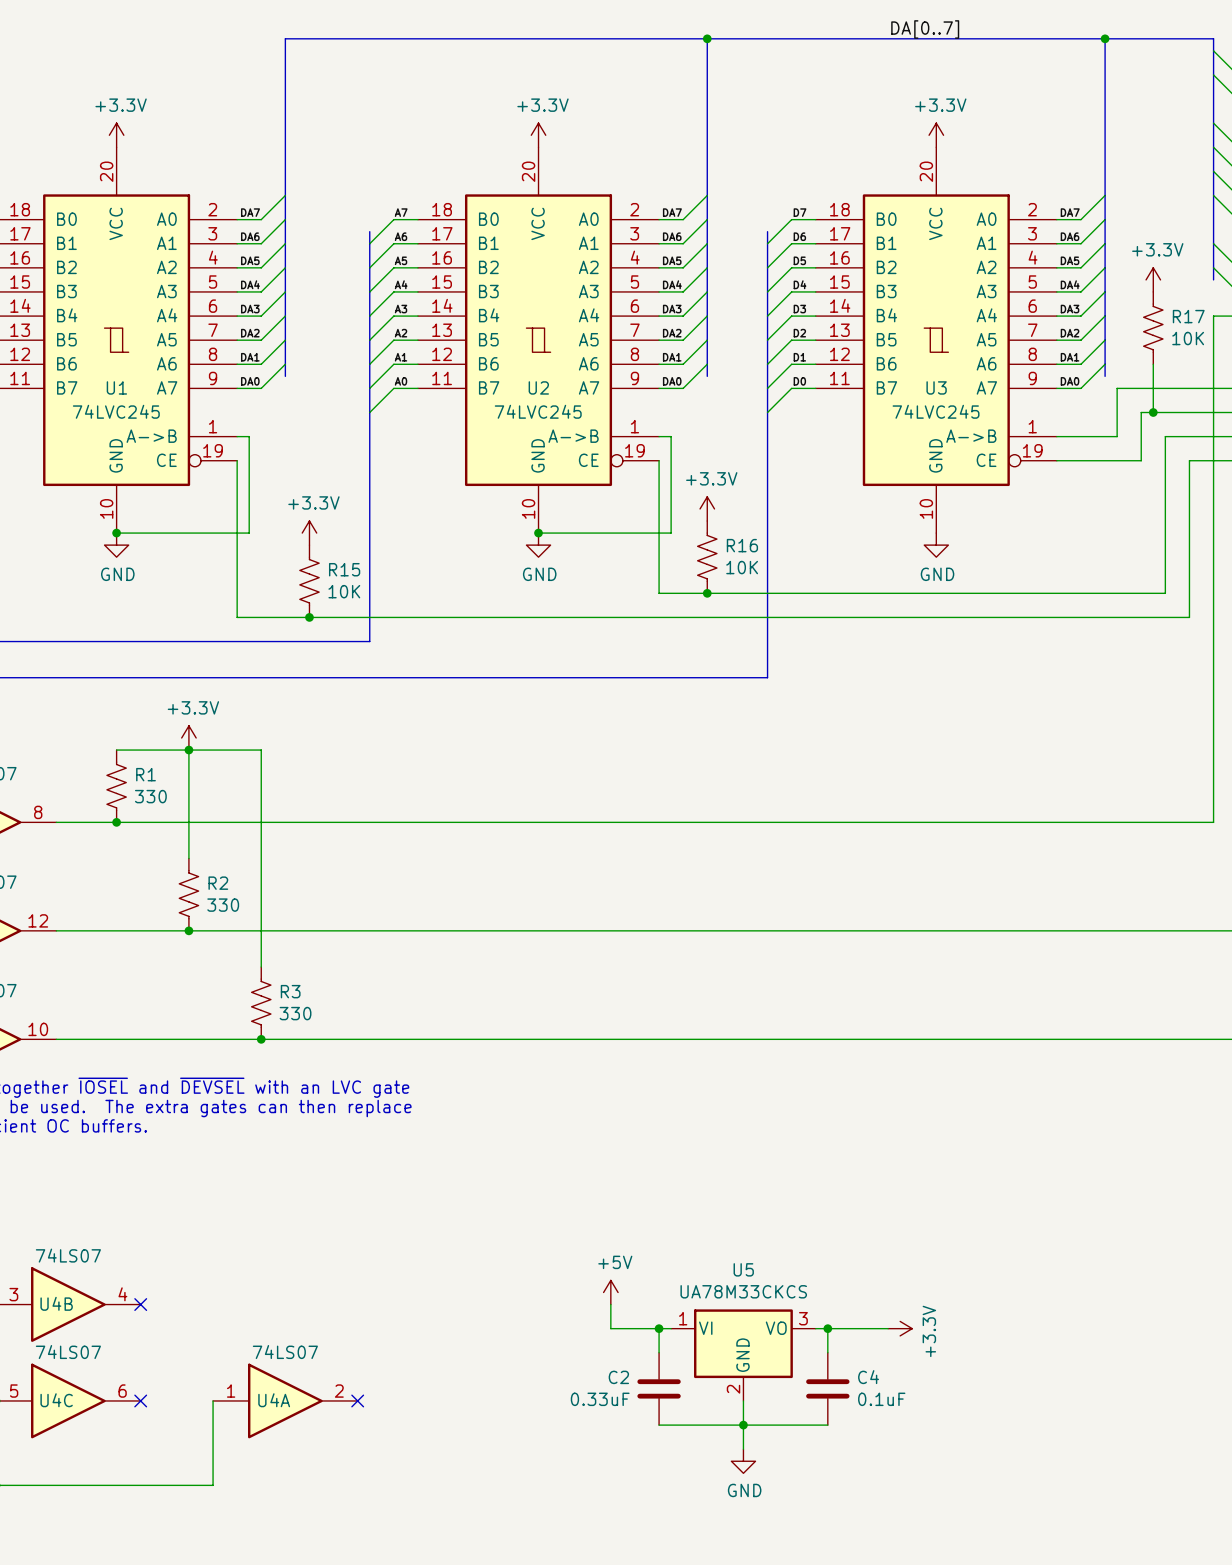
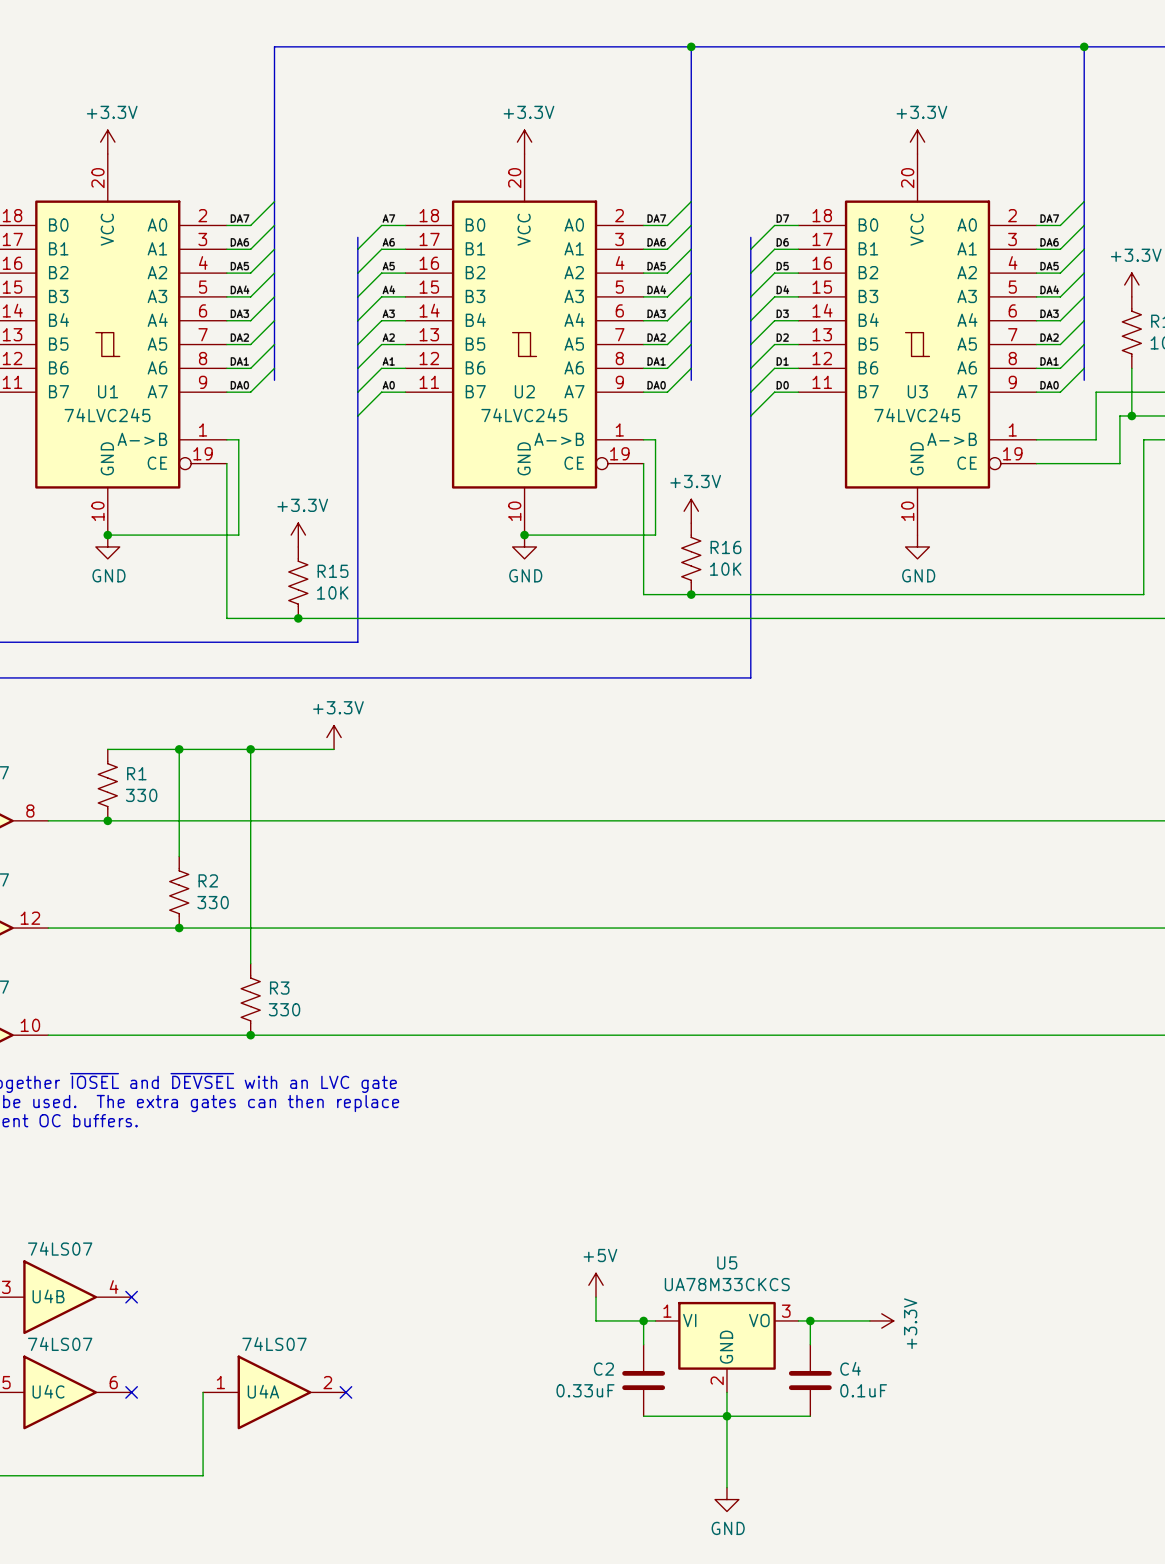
label: DA[0..7] (925, 29) -> none
power symbol position: +3.3V (188, 737) -> +3.3V (334, 737)
wire: none -> (250, 749) (334, 749)
junction: none -> (250, 749)
wire: none -> (726, 1440) (726, 1487)
power symbol position: GND (743, 1461) -> GND (726, 1499)

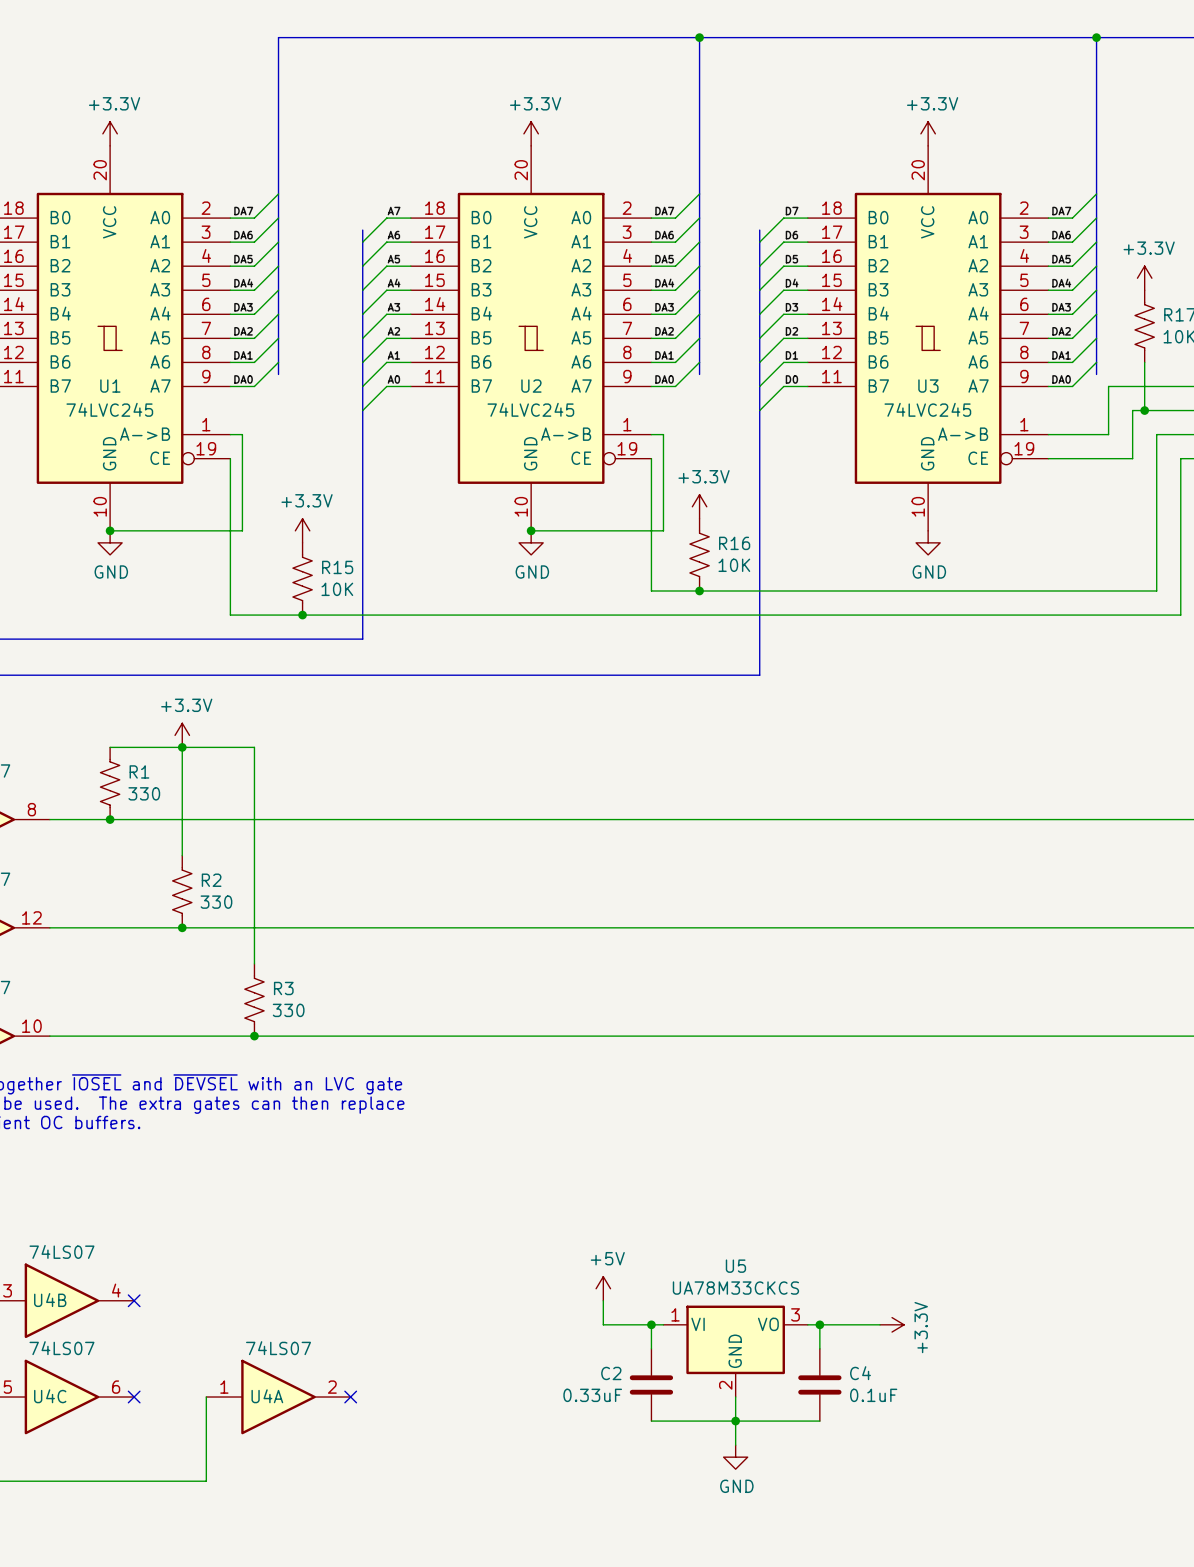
power symbol position: +3.3V (334, 737) -> +3.3V (182, 735)
wire: (250, 749) (334, 749) -> none
junction: (250, 749) -> none
wire: (726, 1440) (726, 1487) -> none
power symbol position: GND (726, 1499) -> GND (735, 1457)

